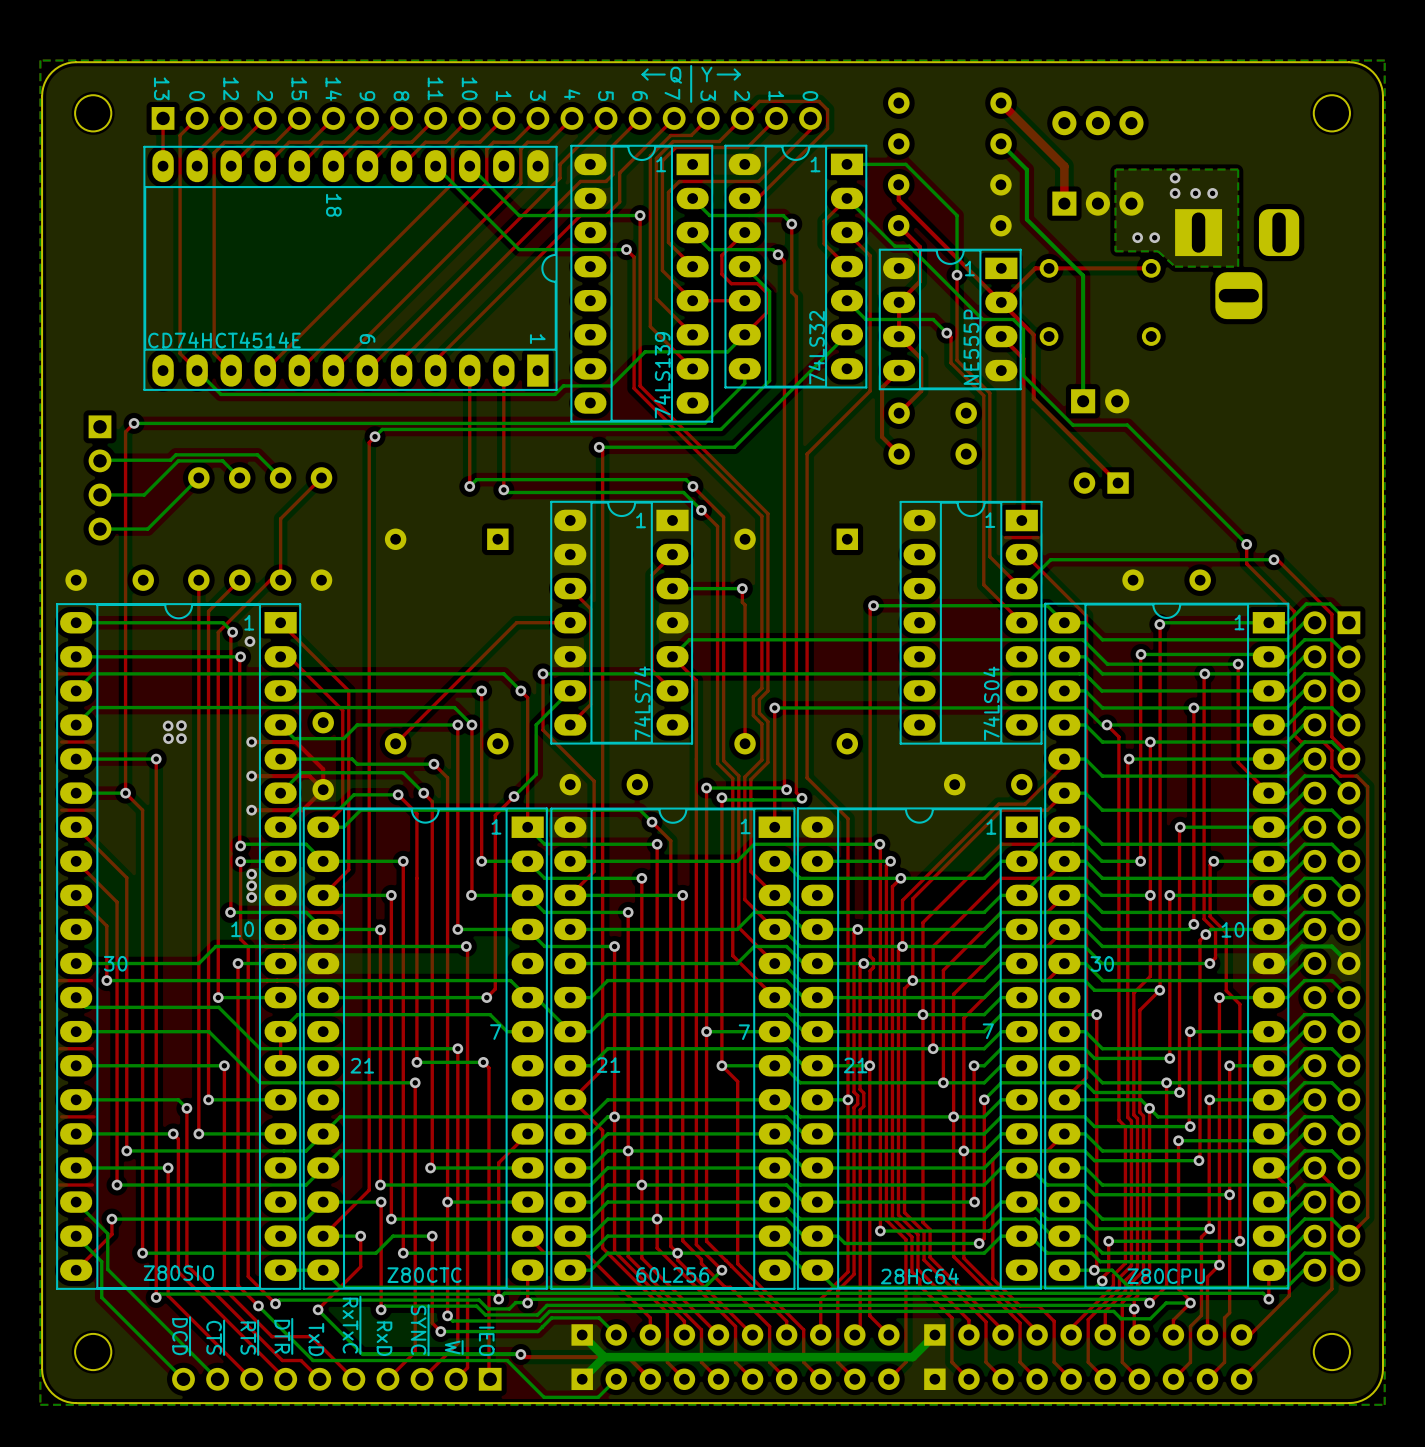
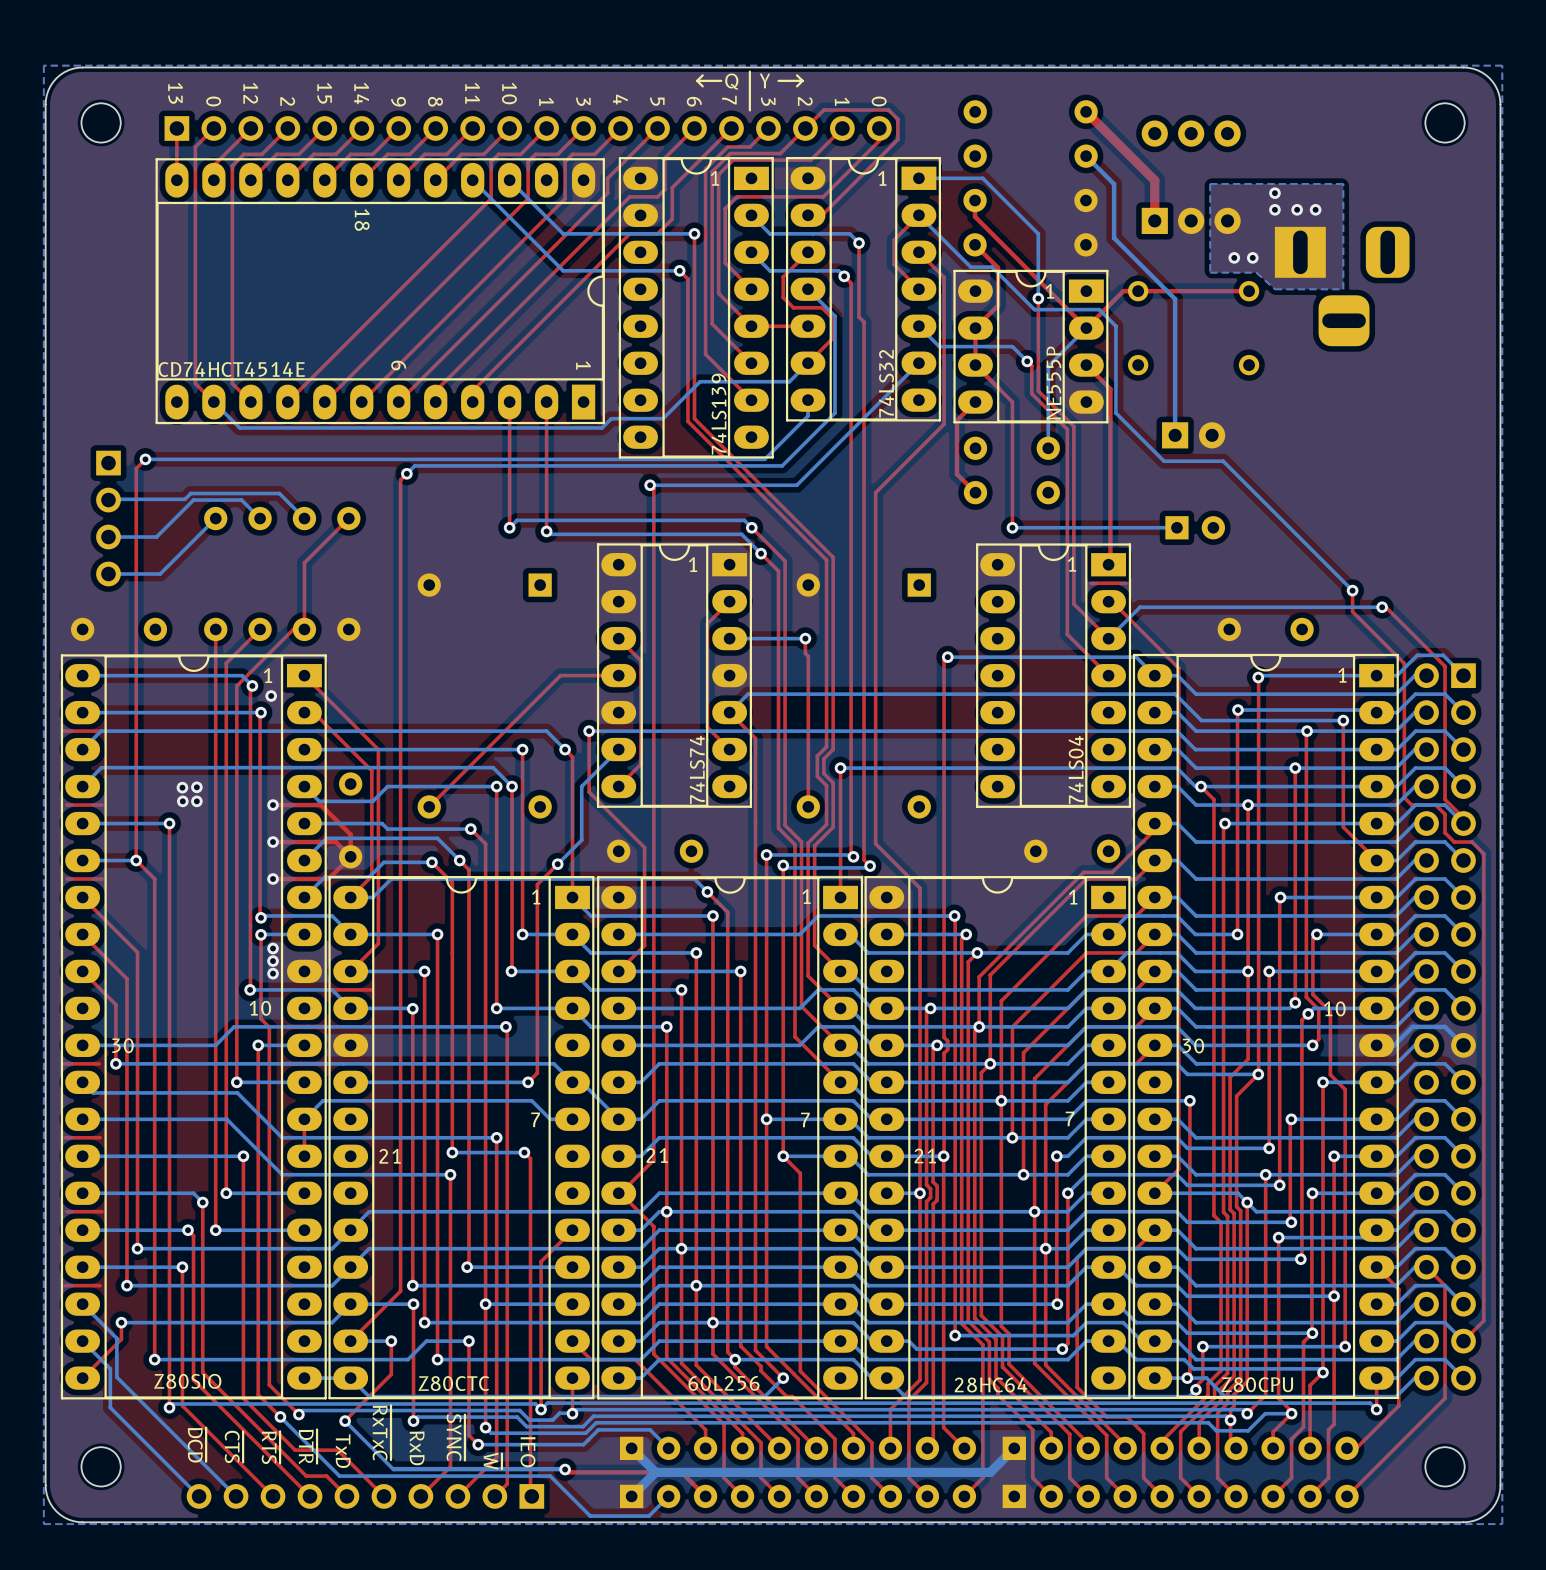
bottom track: (909, 246) (982, 319) (1013, 319) (1023, 329) (1023, 375) (1028, 380) -> (986, 267) (991, 267) (1034, 309) (1099, 309) (1115, 326) (1115, 413)
top track: (1001, 302) (1033, 334) (1033, 398) (1118, 483) -> none
bottom track: none -> (1086, 328) (1048, 366) (1048, 448)
top track: (921, 358) (921, 391) (899, 413) -> (999, 389) (1012, 402) (1012, 527)
part rotation: 0° (1101, 483) -> 180° (1195, 527)
via: none -> (1012, 527)
bottom track: none -> (1176, 527) (1012, 527)

